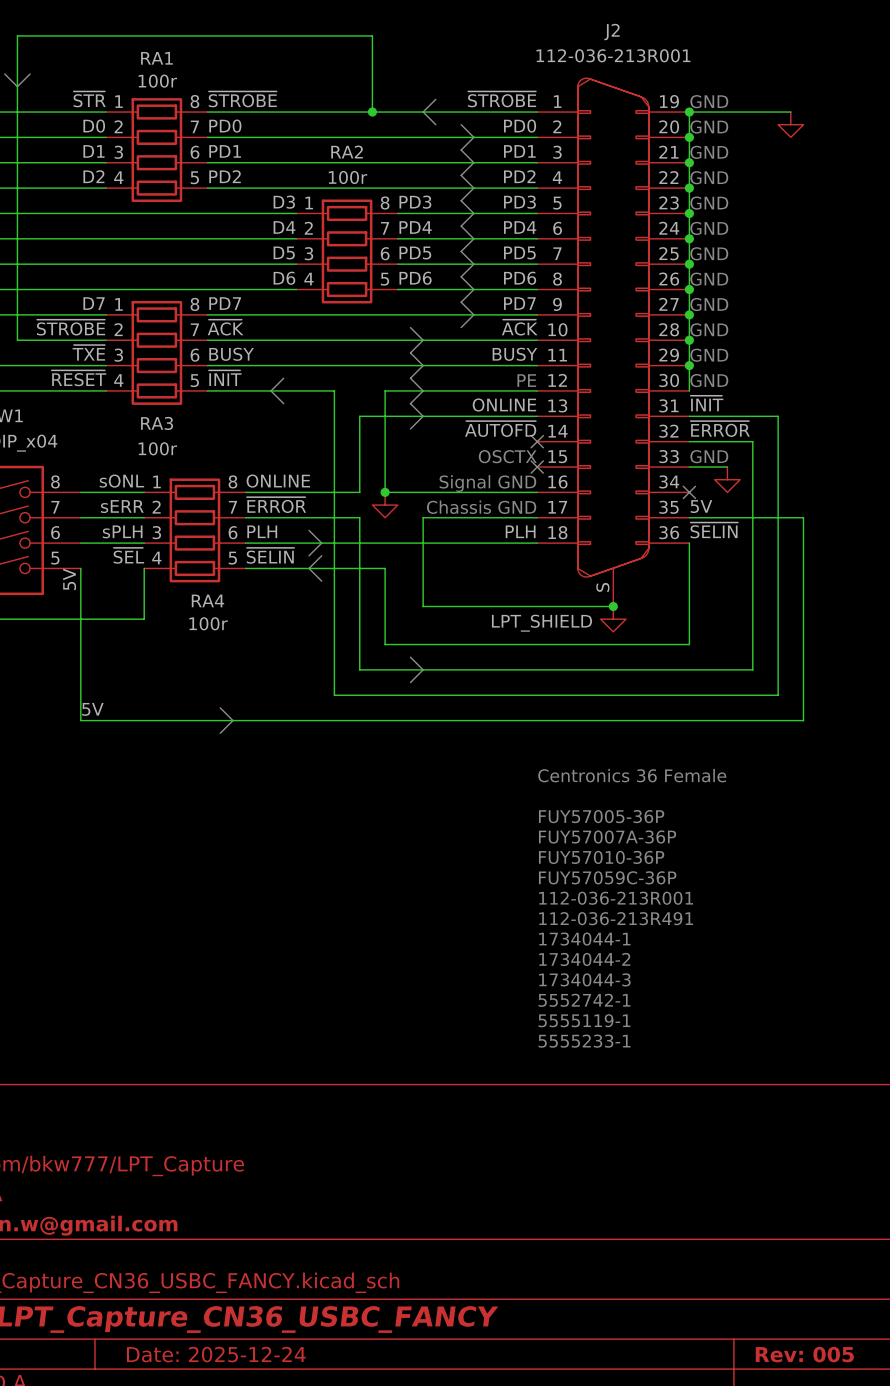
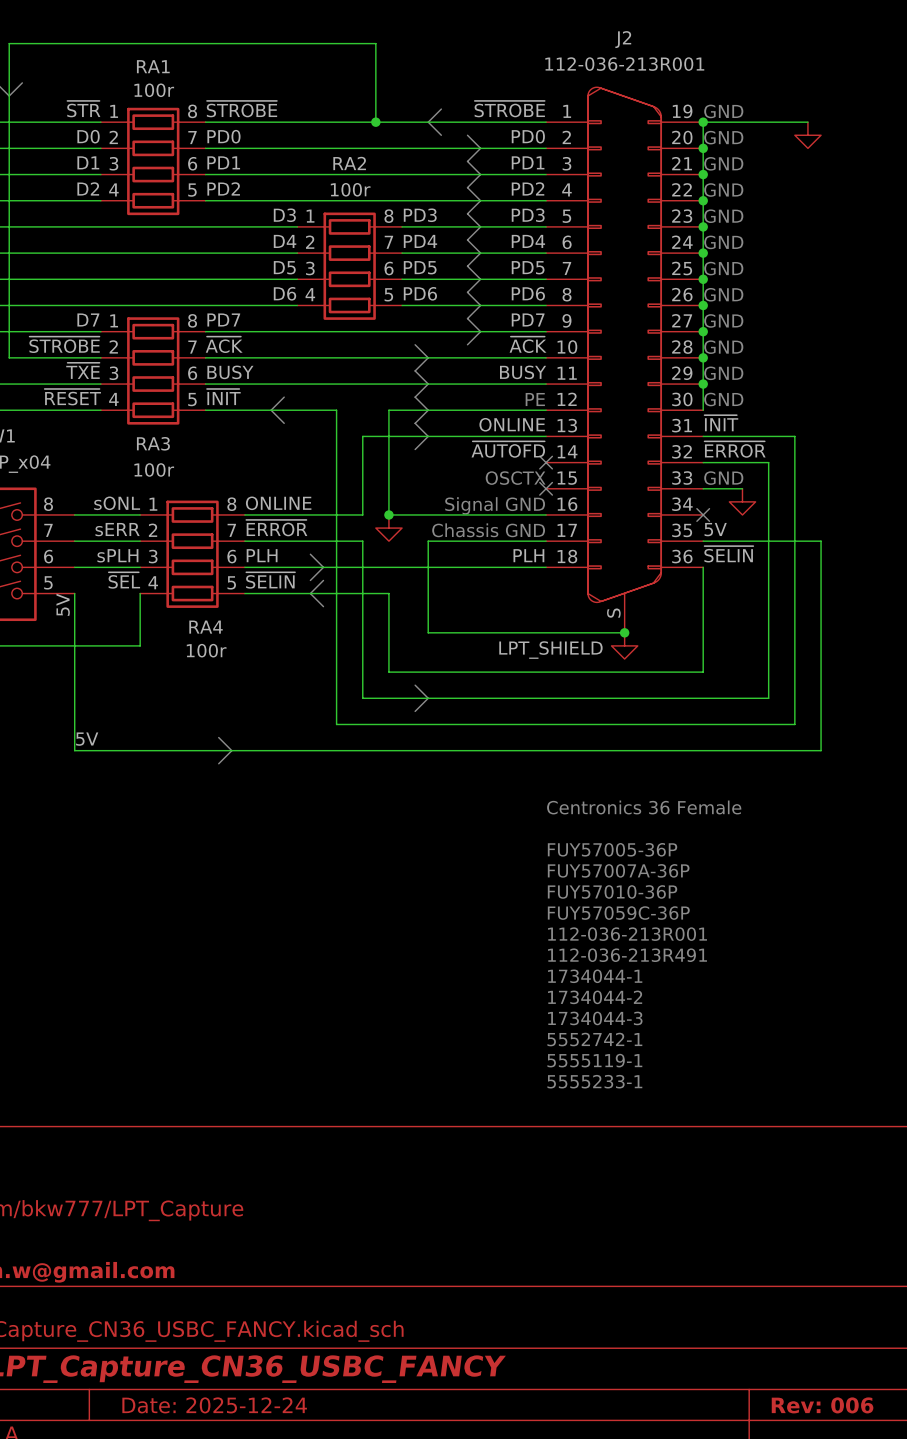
title block: Rev: 005 (804, 1354) -> Rev: 006 (822, 1405)

